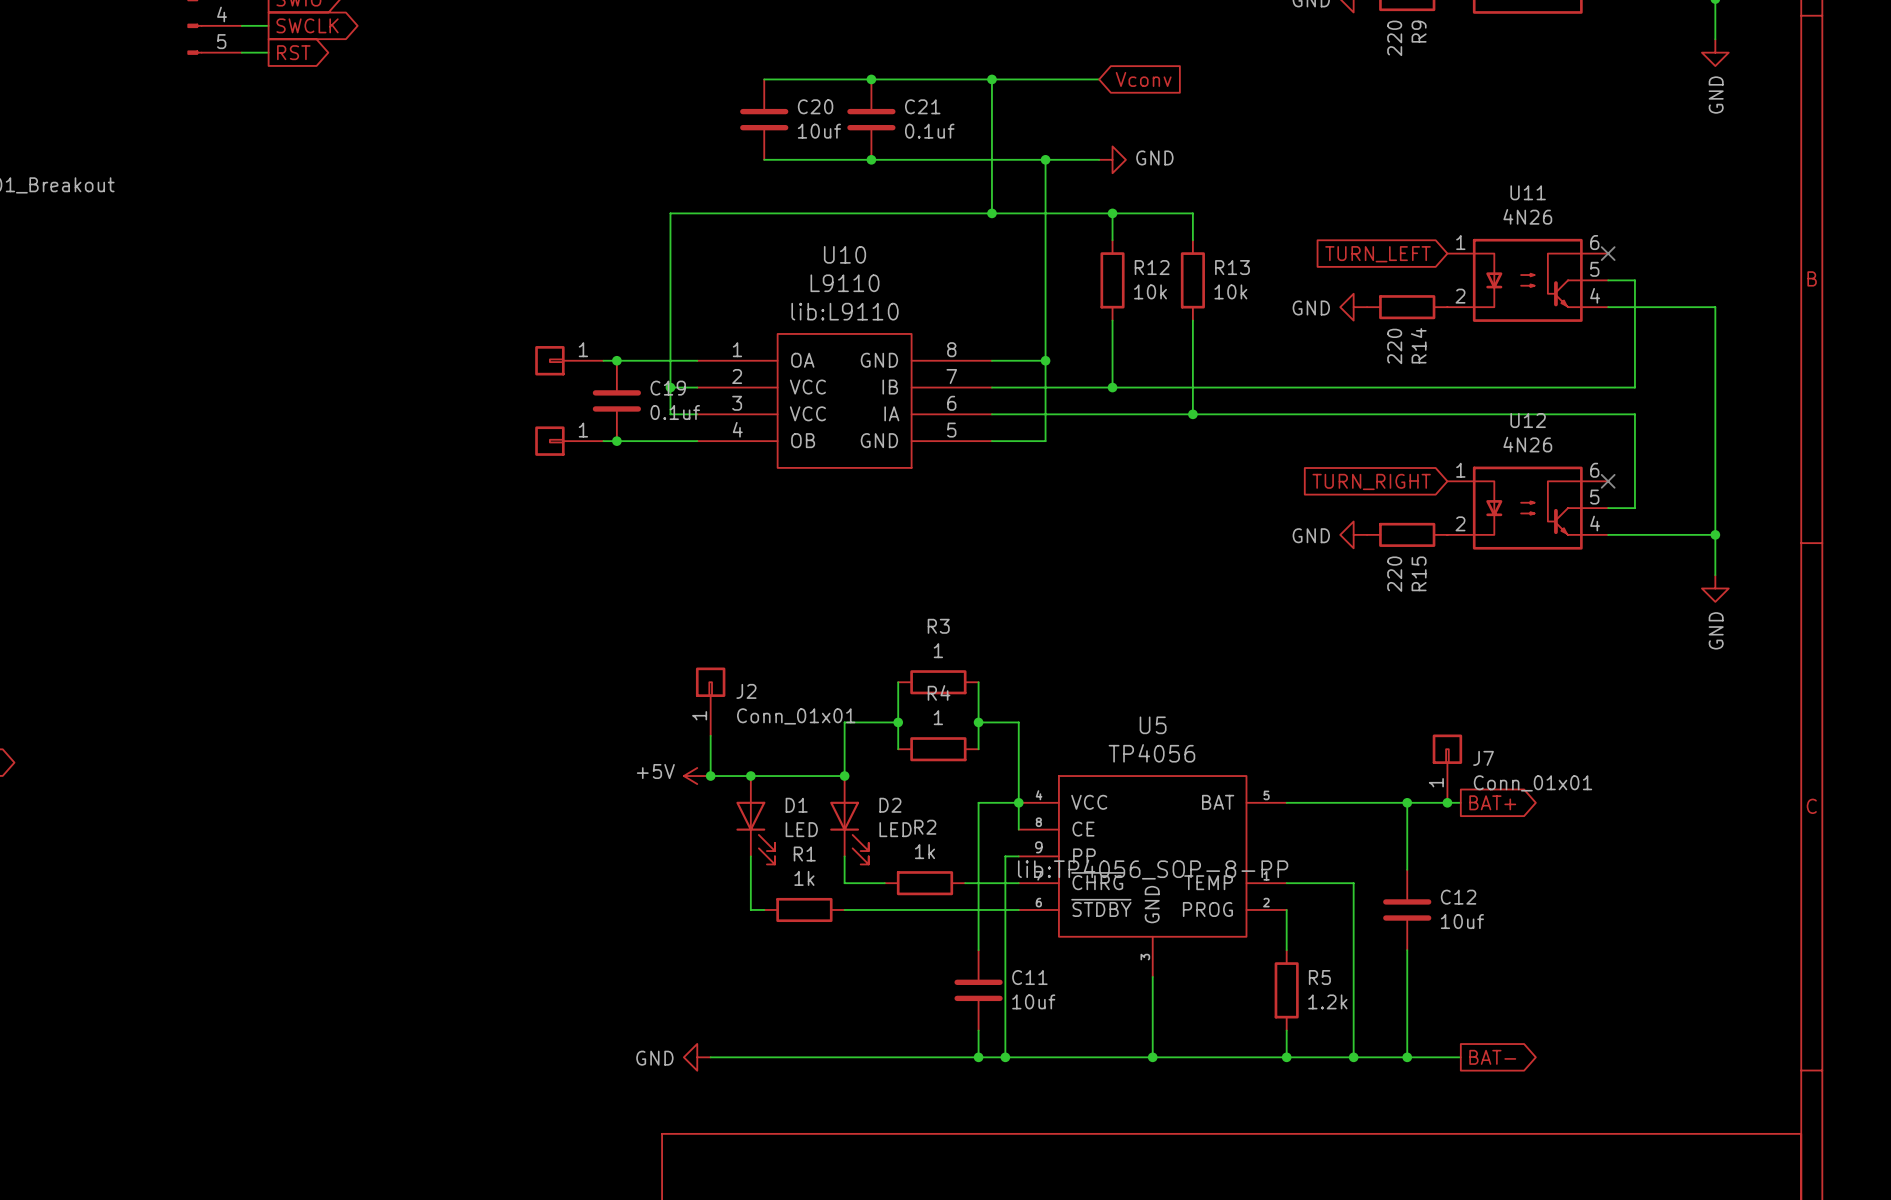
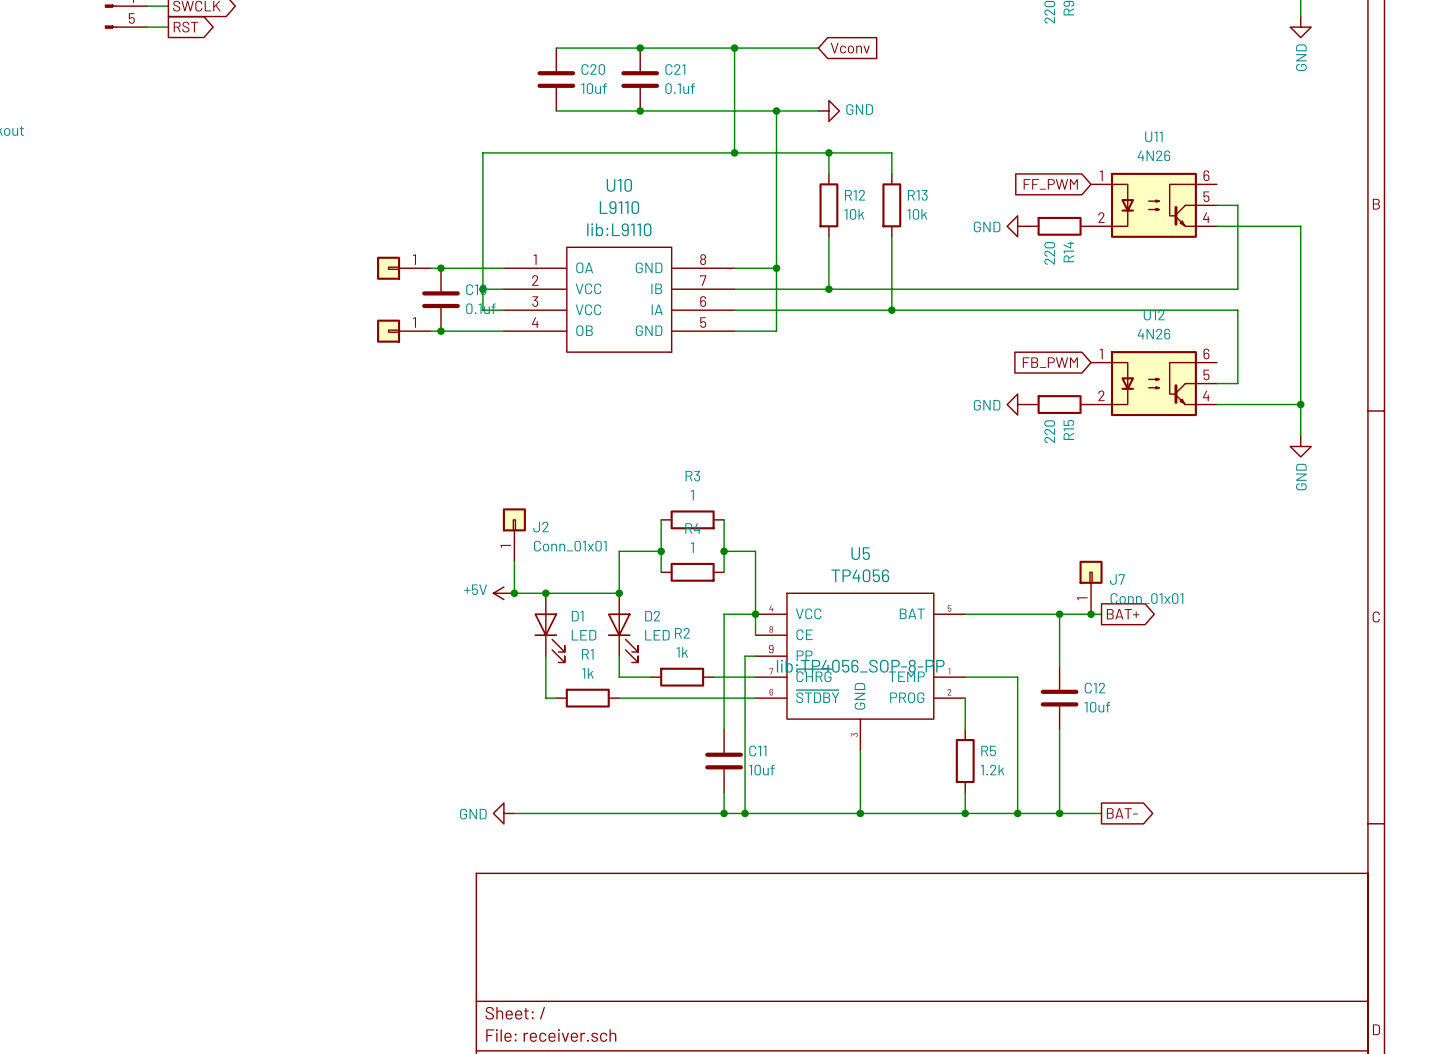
no-connect mark: (1608, 253) -> none
global label: TURN_LEFT (1378, 254) -> FF_PWM (1050, 184)
global label: TURN_RIGHT (1371, 481) -> FB_PWM (1050, 362)
no-connect mark: (1608, 481) -> none

